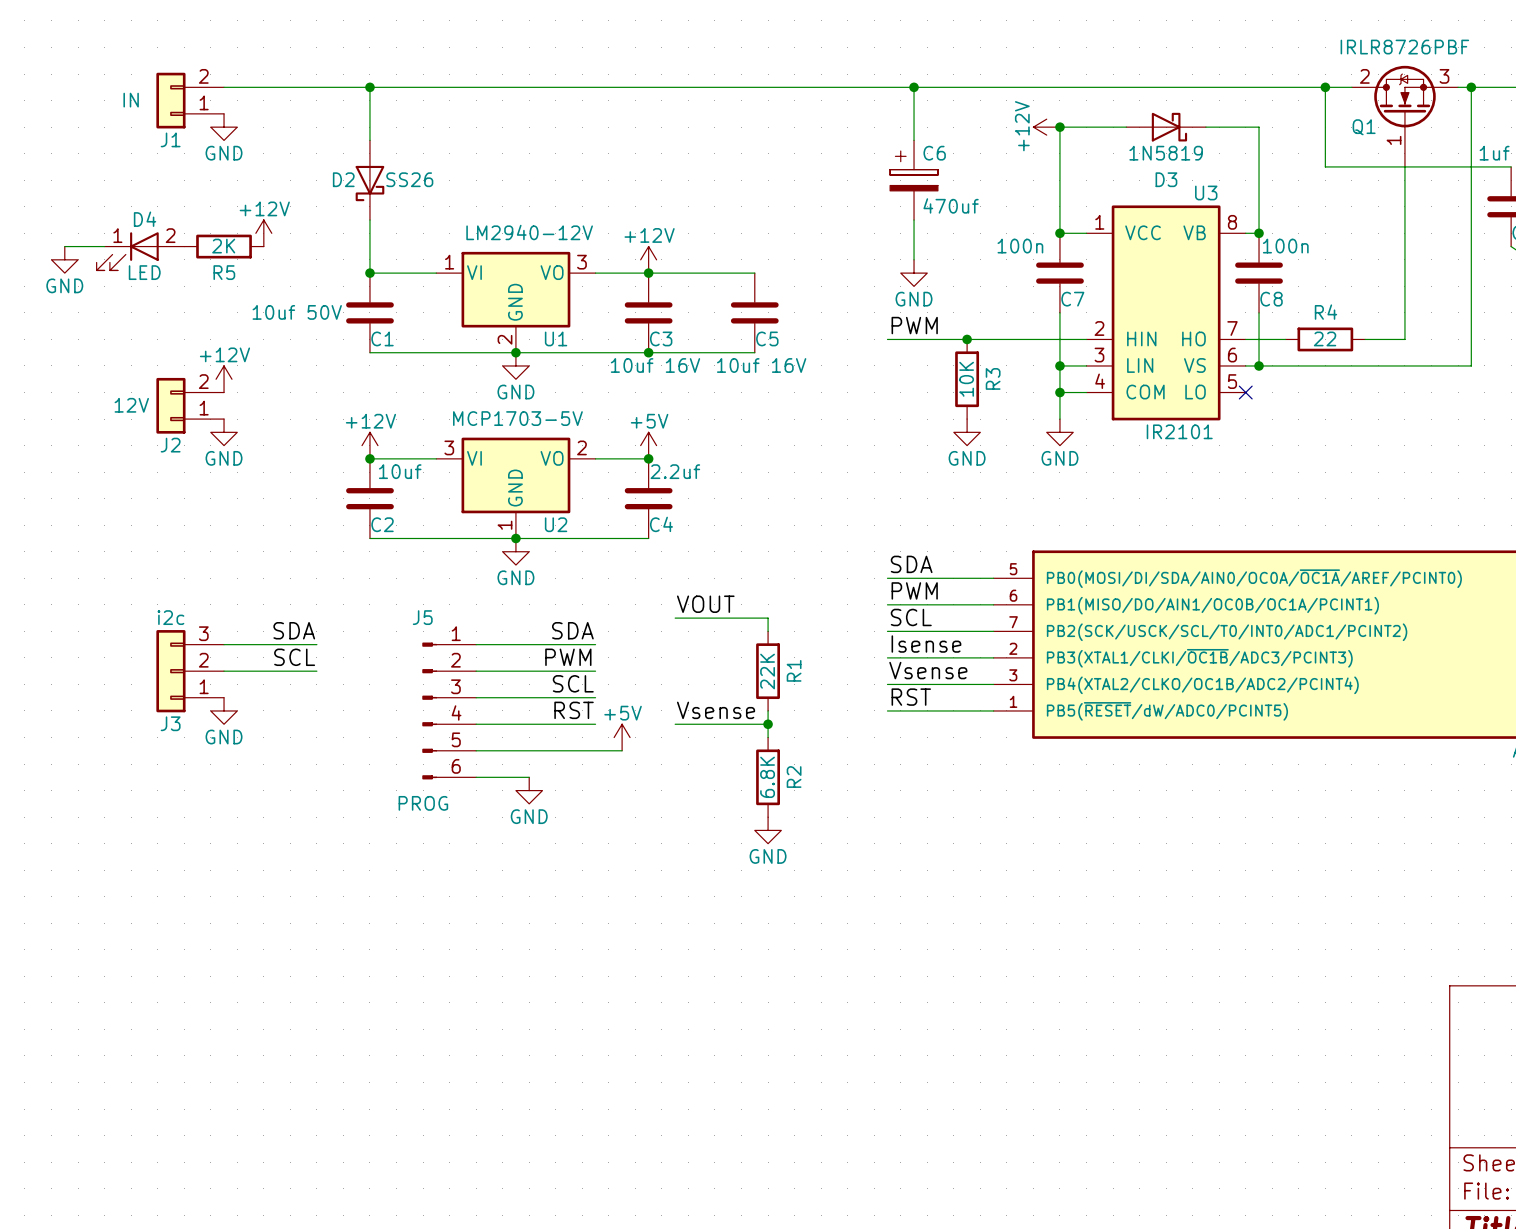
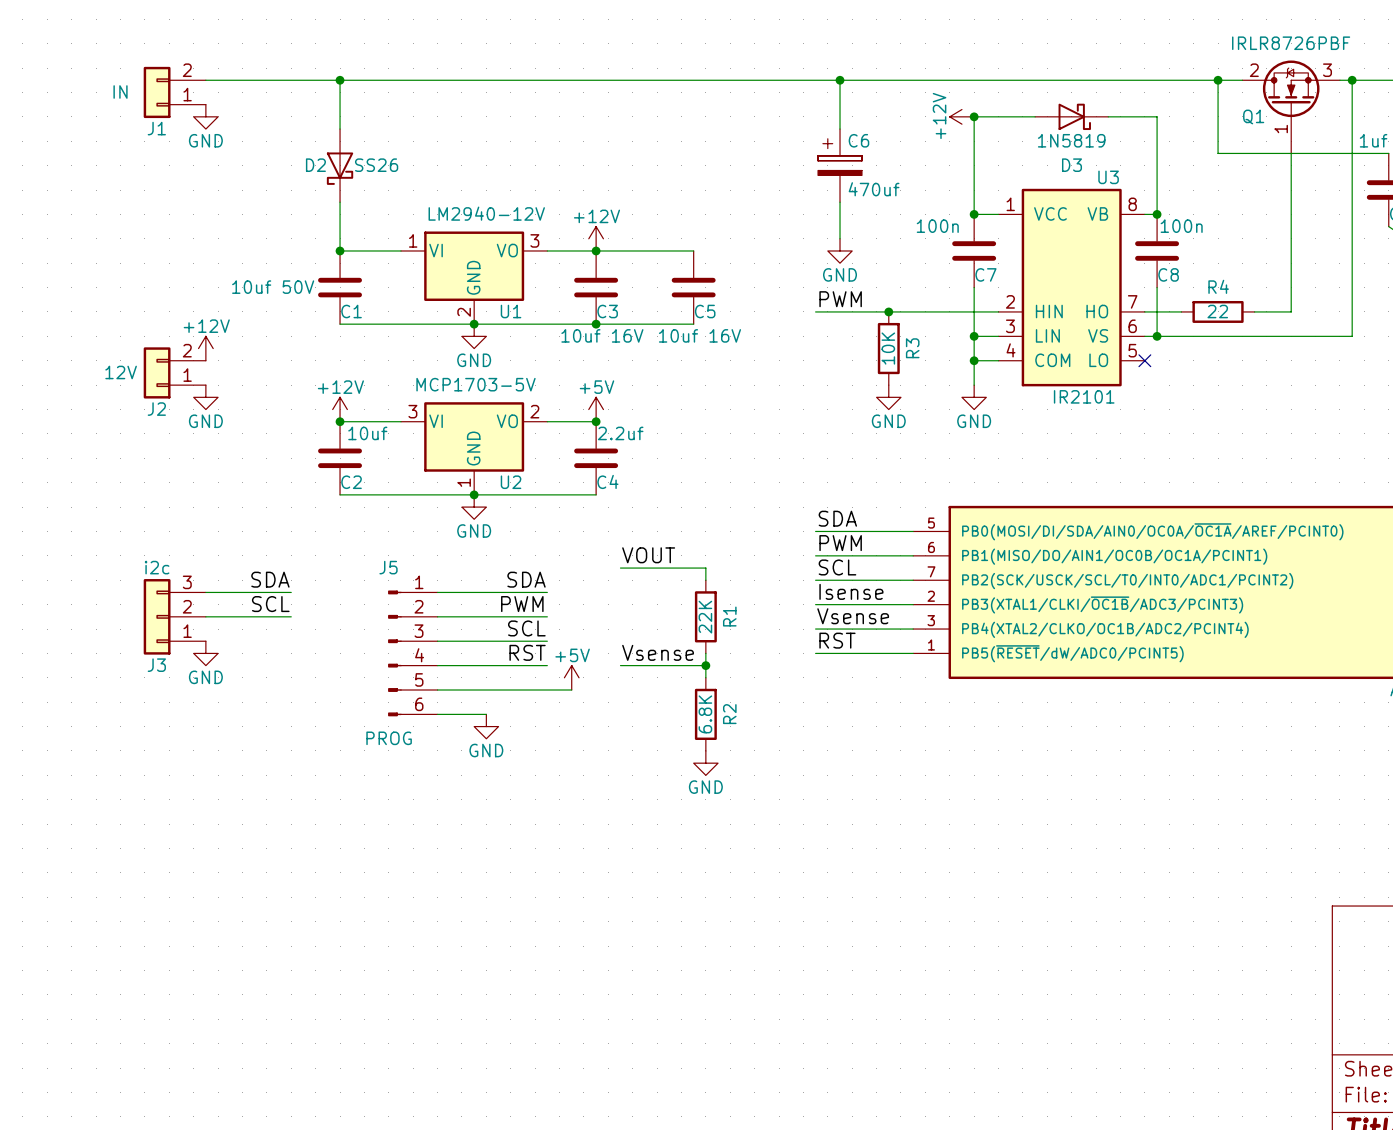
power symbol: +12V (263, 233) -> none
wire: (64, 246) (104, 246) -> none
R5: 2K (224, 246) -> none
D4: LED (140, 251) -> none
power symbol: GND (64, 259) -> none

